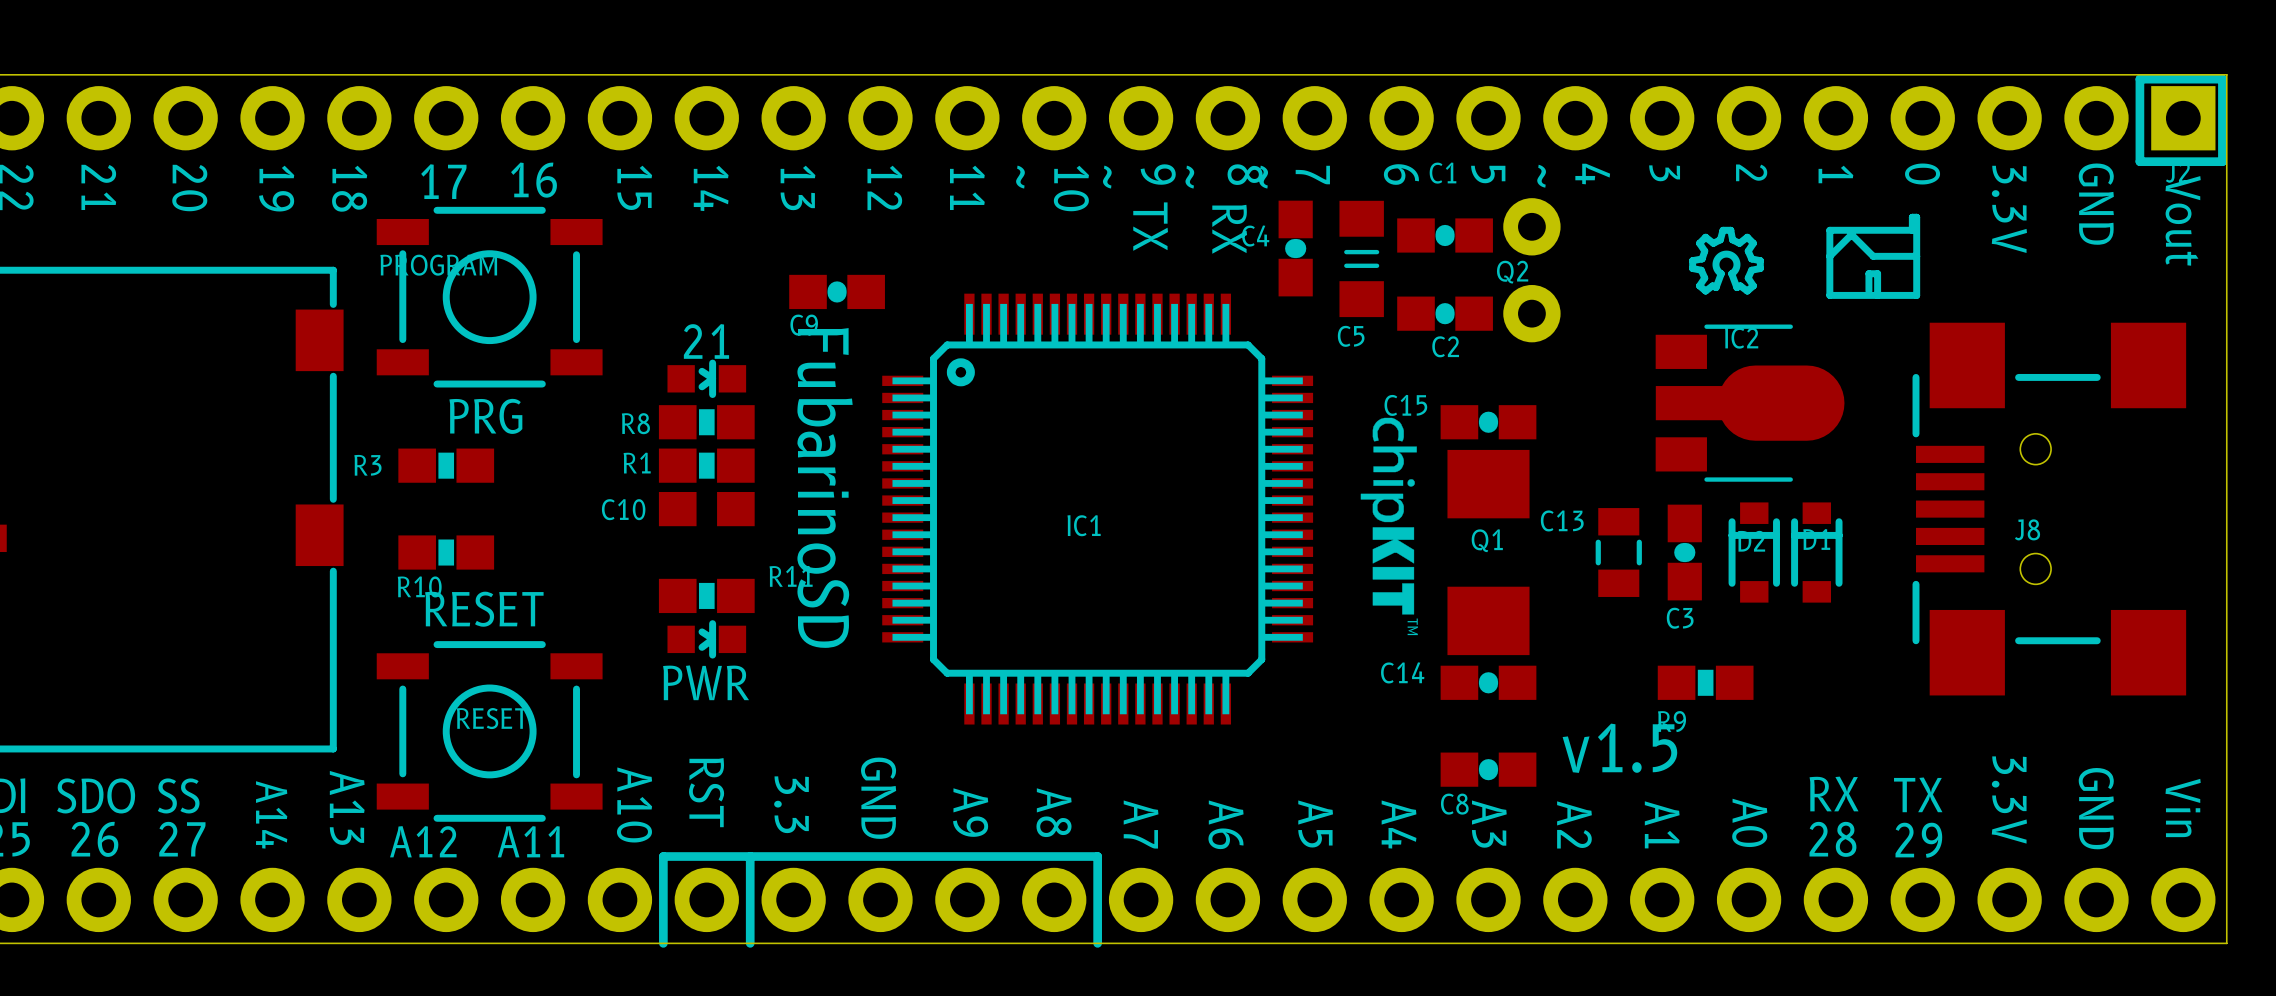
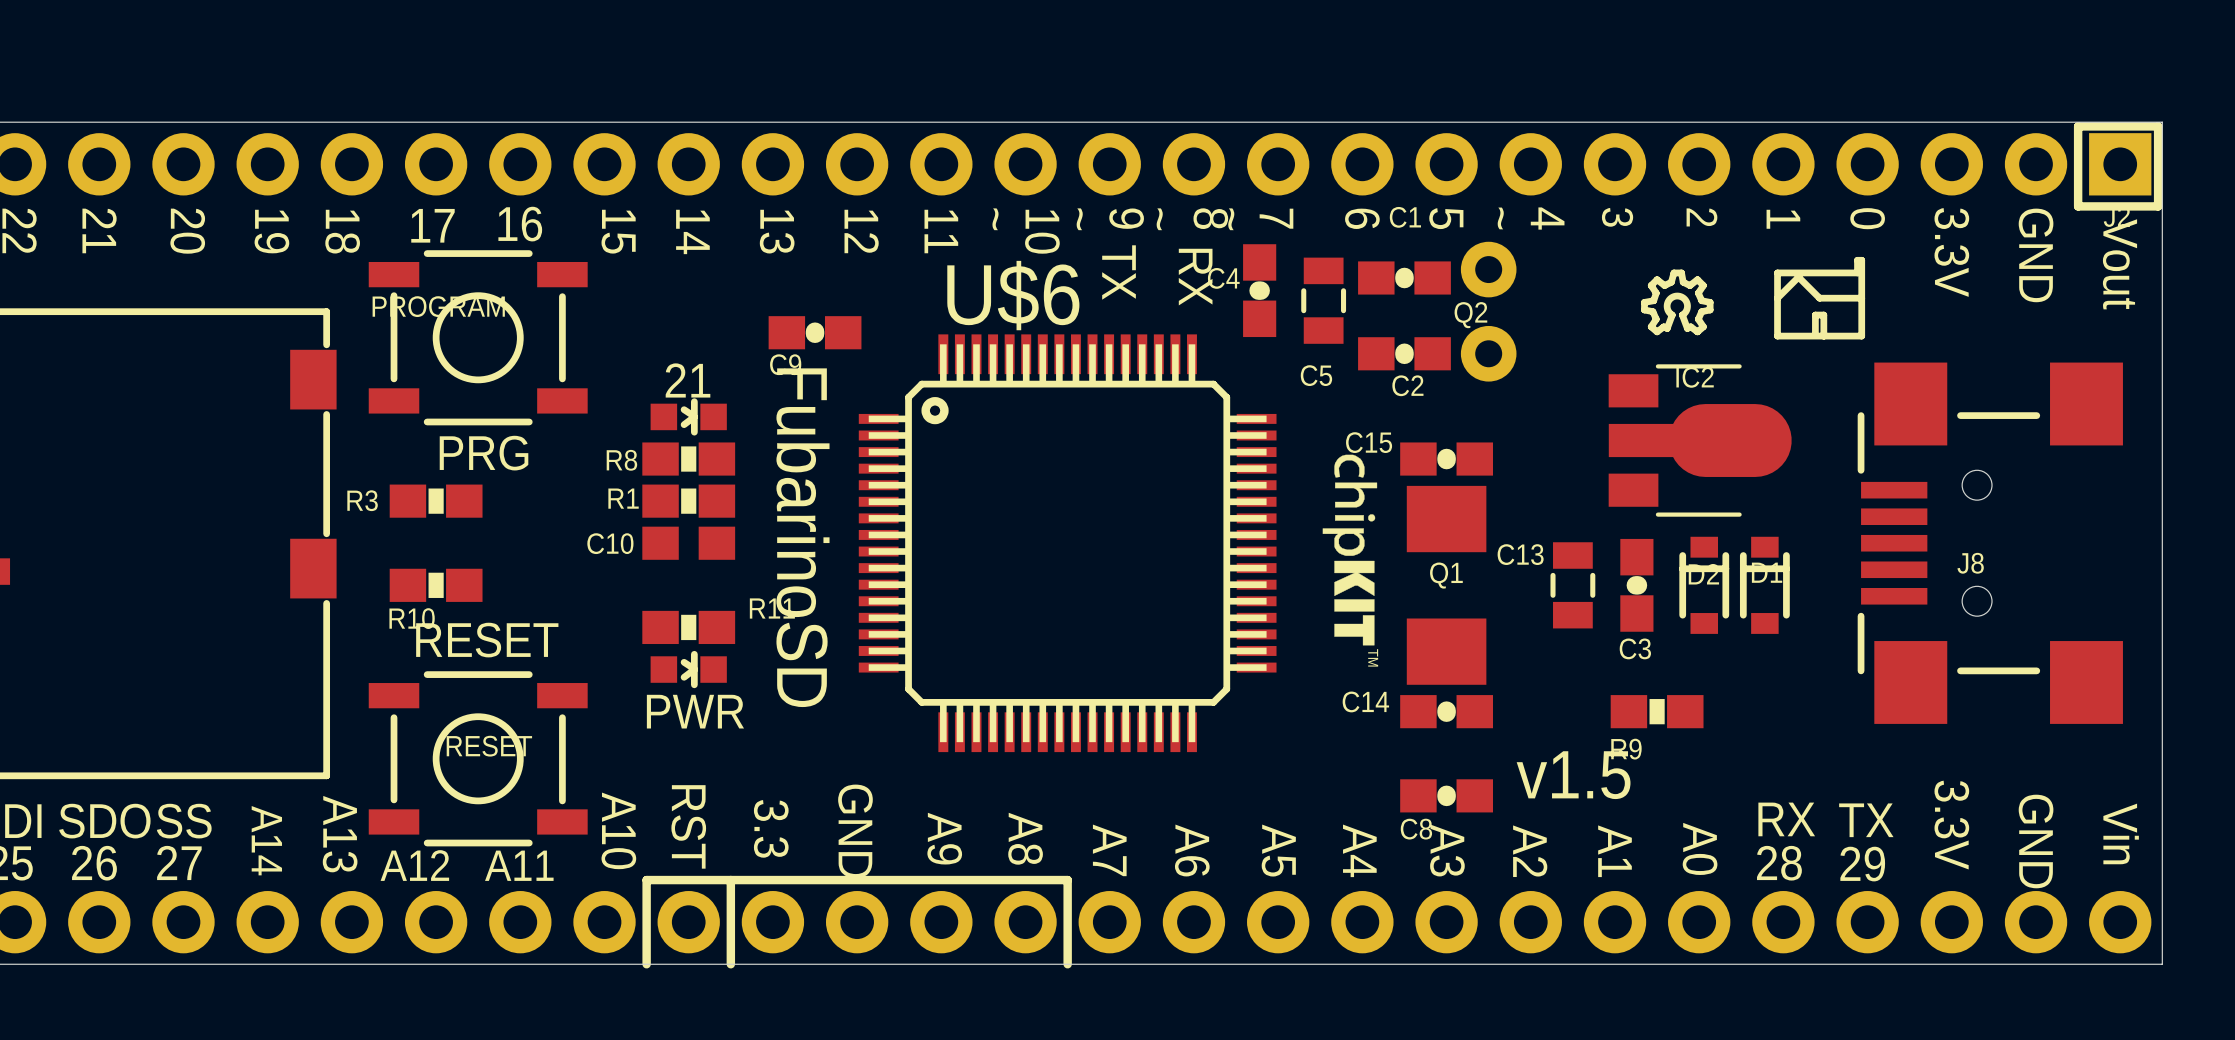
C5 footprint: [1339, 200, 1384, 318] -> [1301, 257, 1347, 344]
IC1 name: IC1 (1084, 525) -> U$6 (1013, 295)

